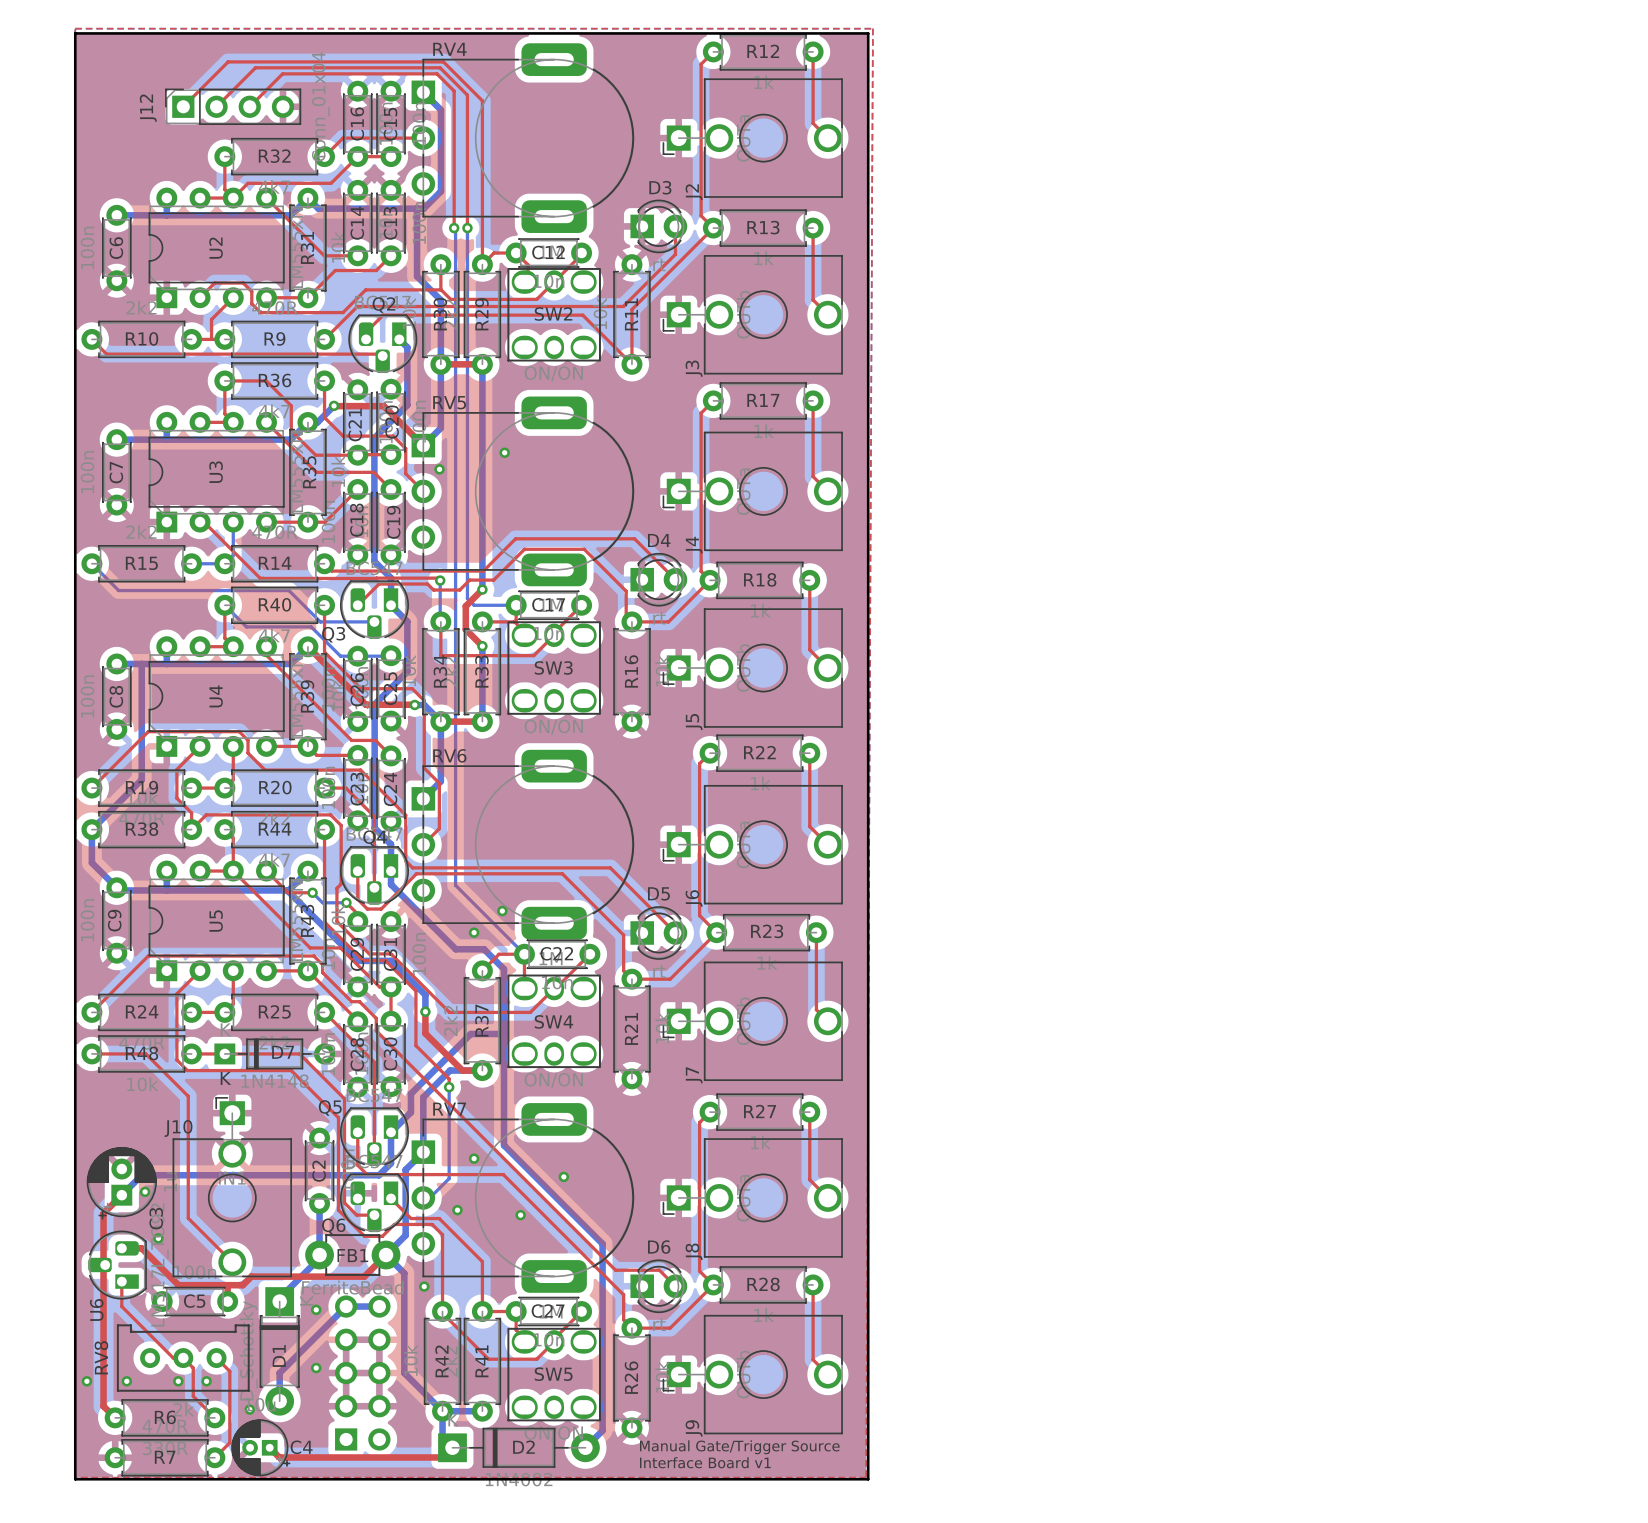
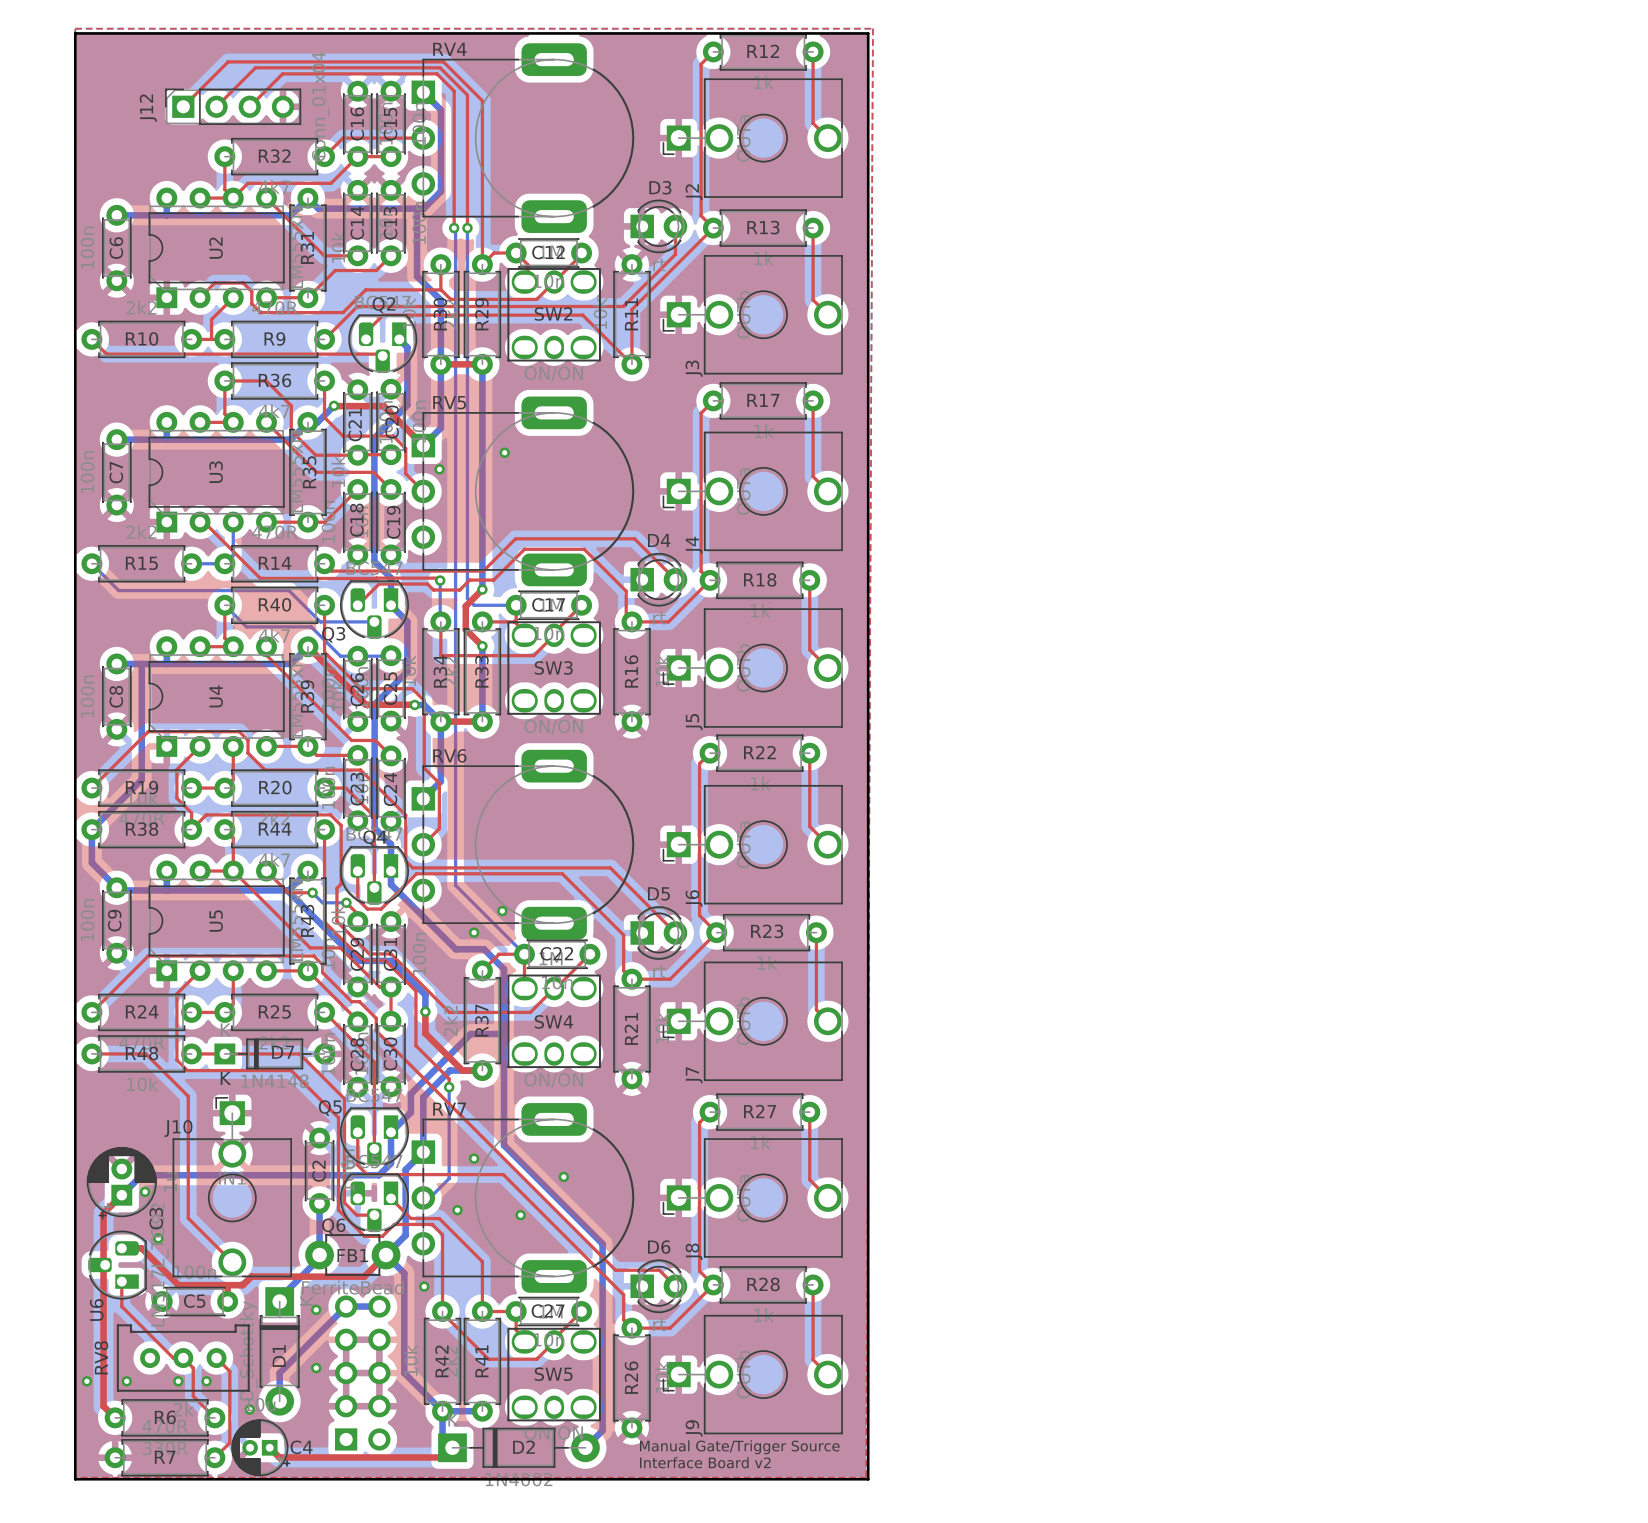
text: Interface Board v1 (705, 1462) -> Interface Board v2 (705, 1462)

